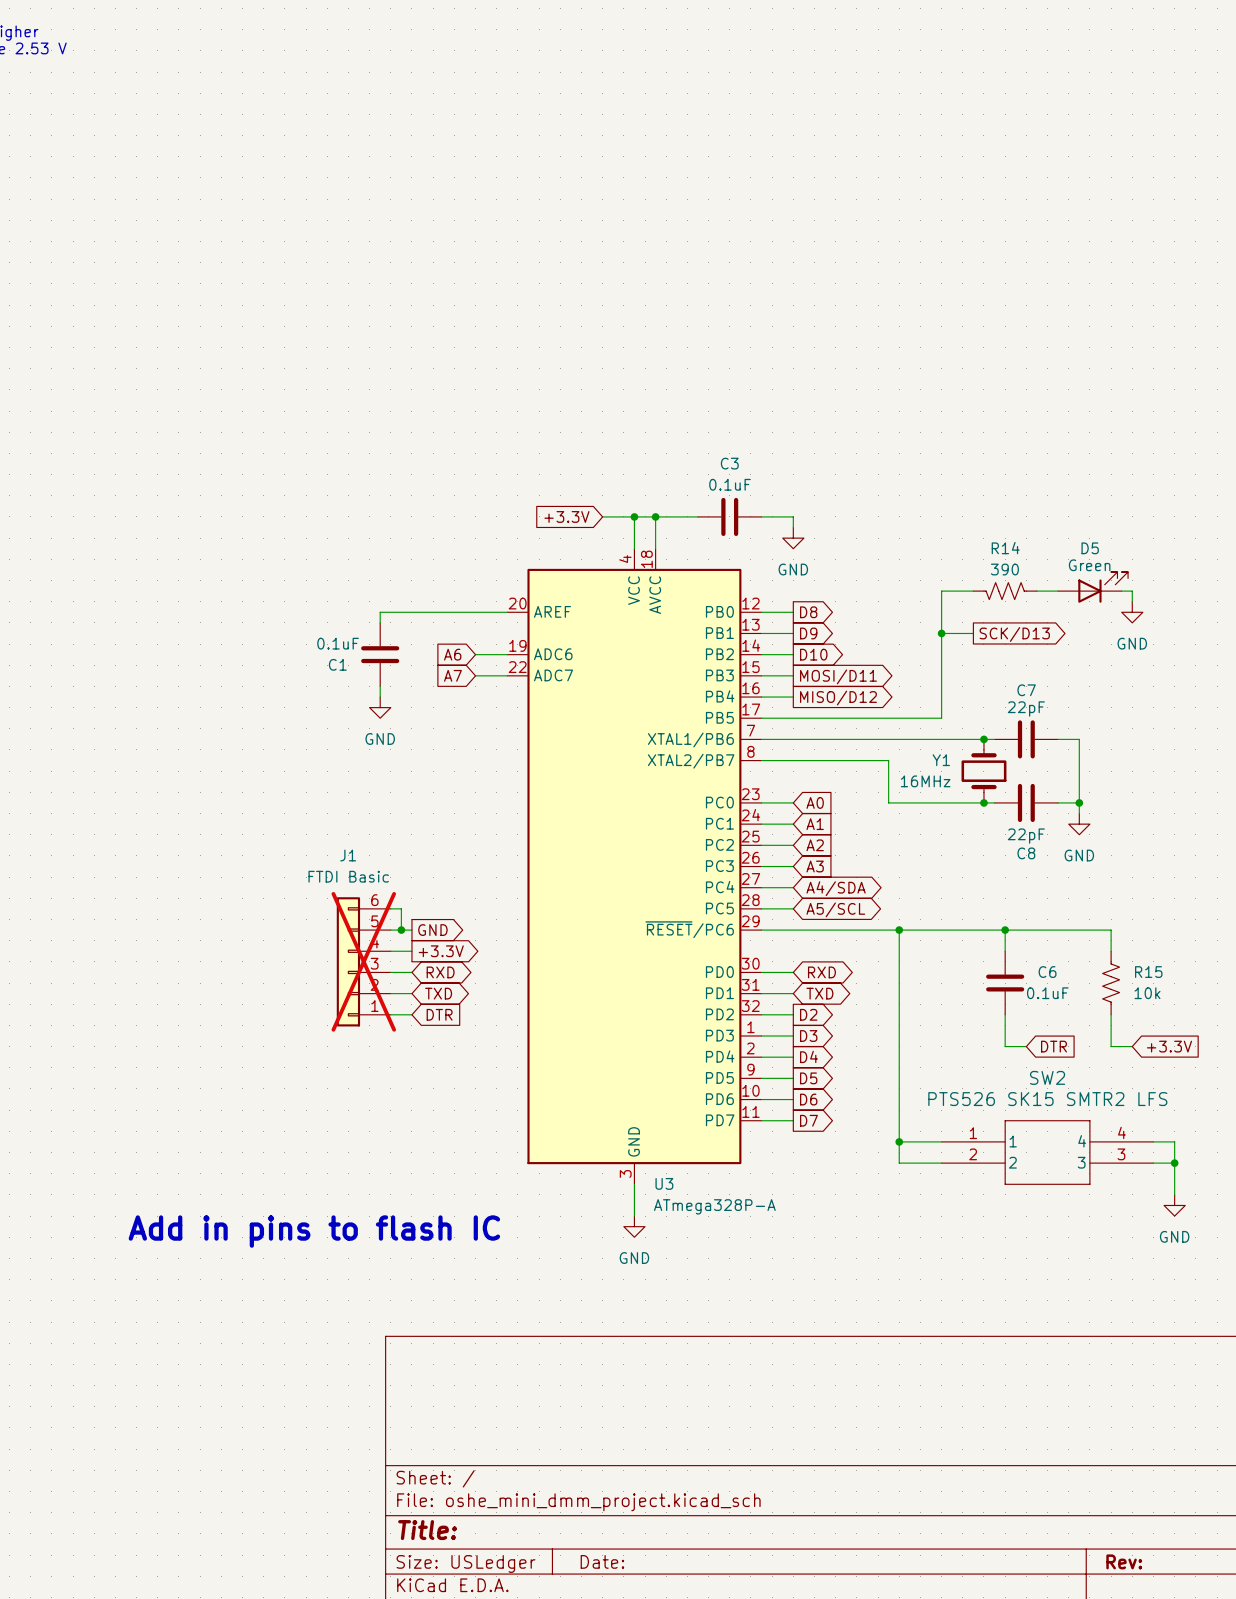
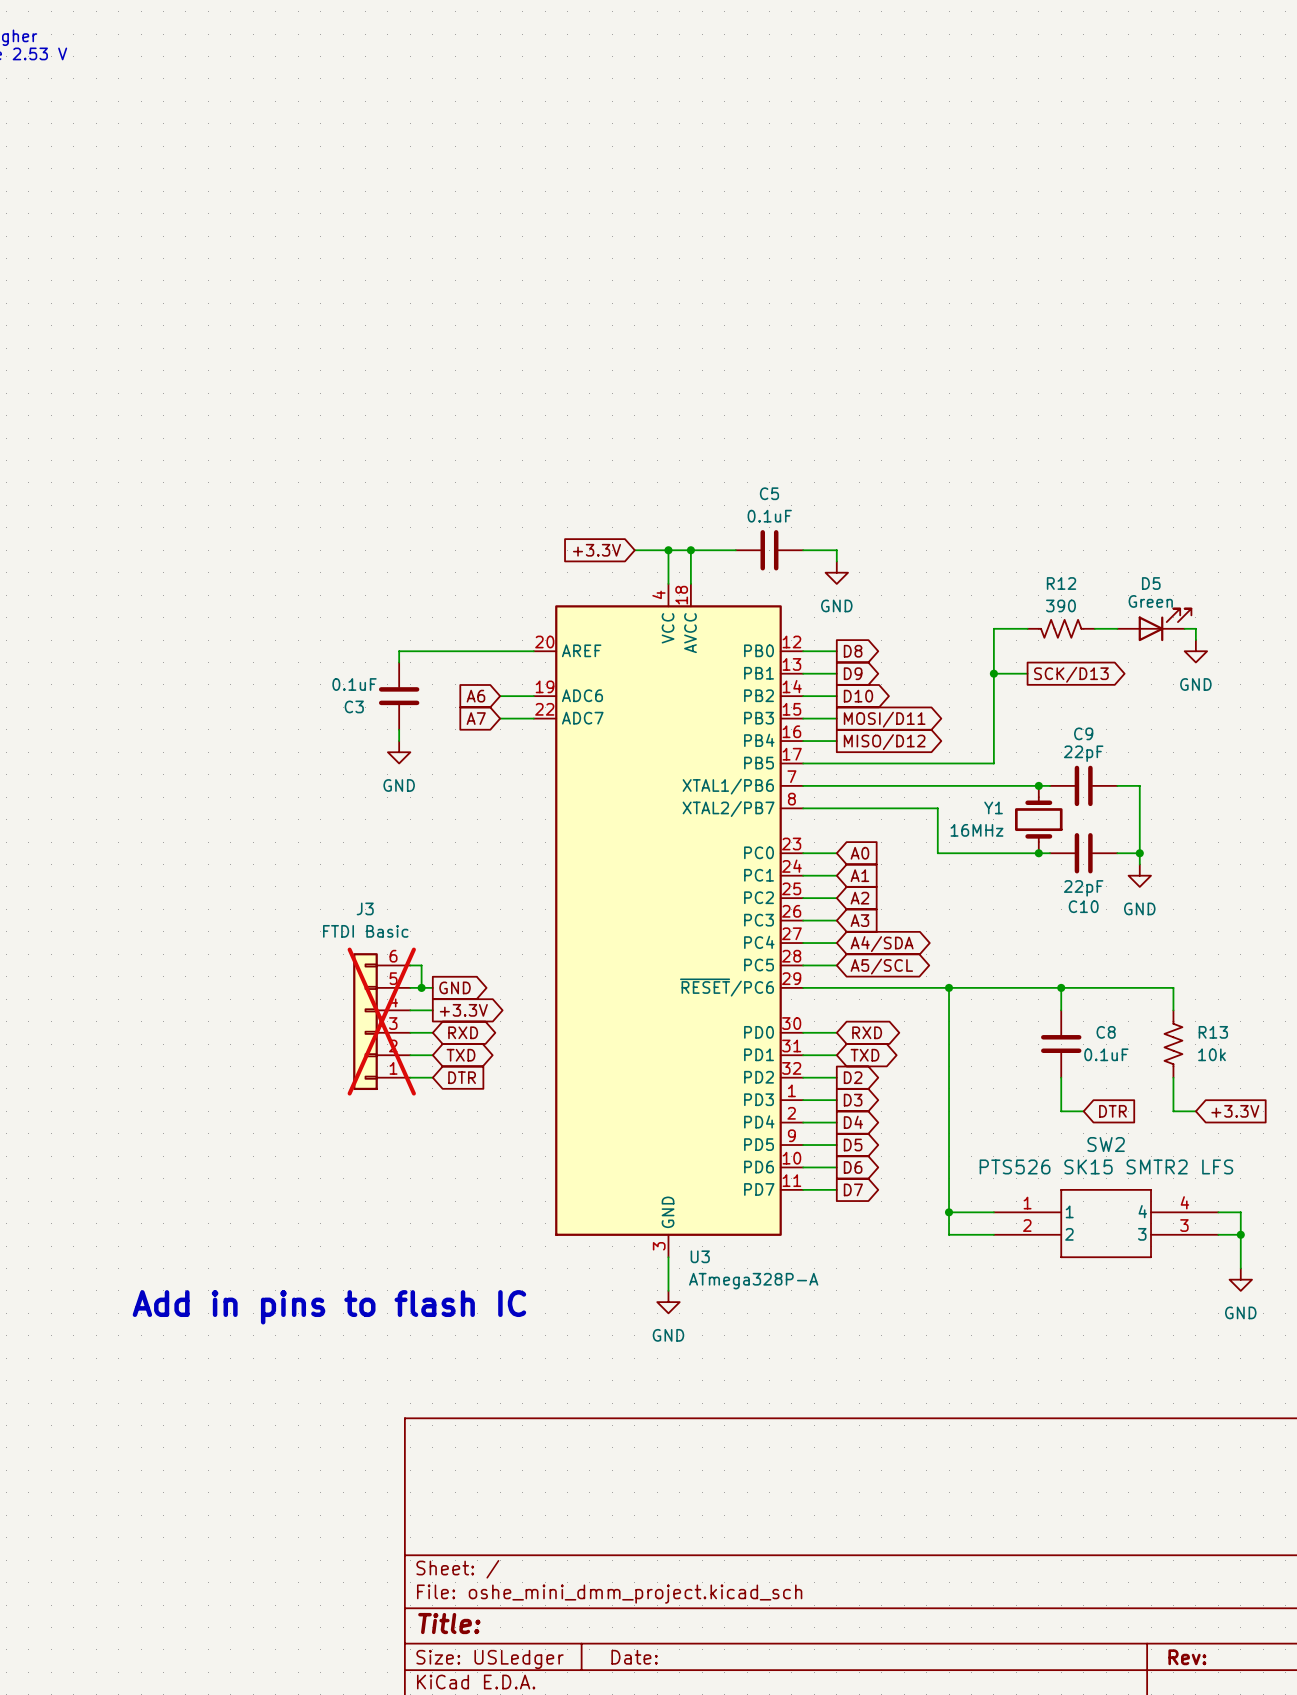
C3 name: C3 (729, 463) -> C5 (769, 493)
R14 name: R14 (1005, 548) -> R12 (1061, 583)
C1 name: C1 (337, 664) -> C3 (354, 706)
C7 name: C7 (1026, 690) -> C9 (1083, 733)
C8 name: C8 (1026, 853) -> C10 (1083, 906)
J1 name: J1 (348, 855) -> J3 (365, 908)
C6 name: C6 (1047, 972) -> C8 (1106, 1032)
R15 name: R15 (1148, 972) -> R13 (1213, 1032)

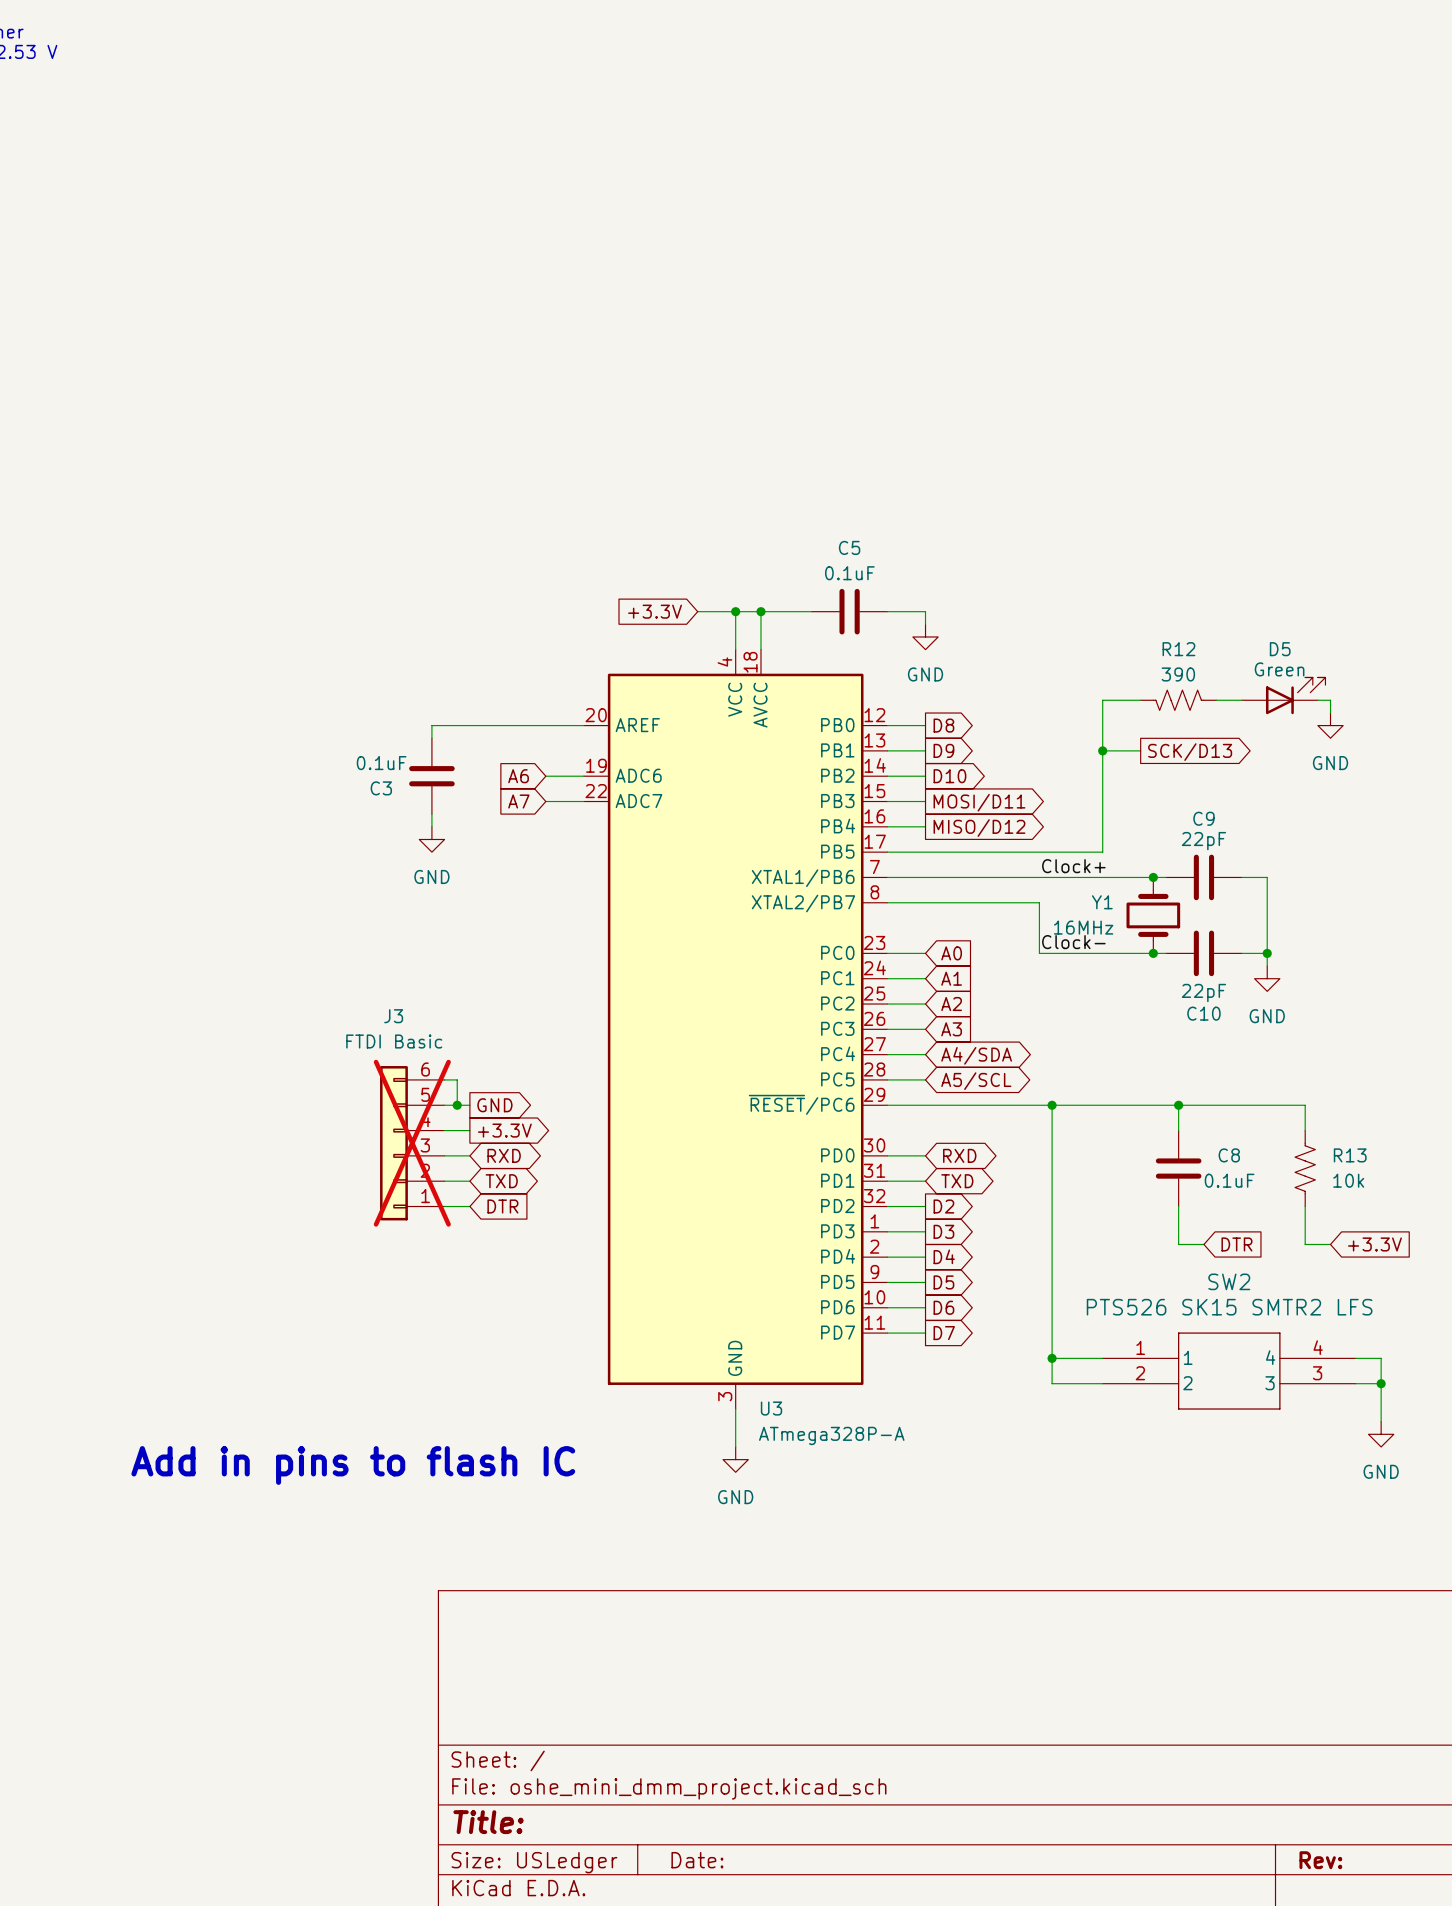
label: none -> Clock+ (1073, 866)
label: none -> Clock- (1073, 942)

